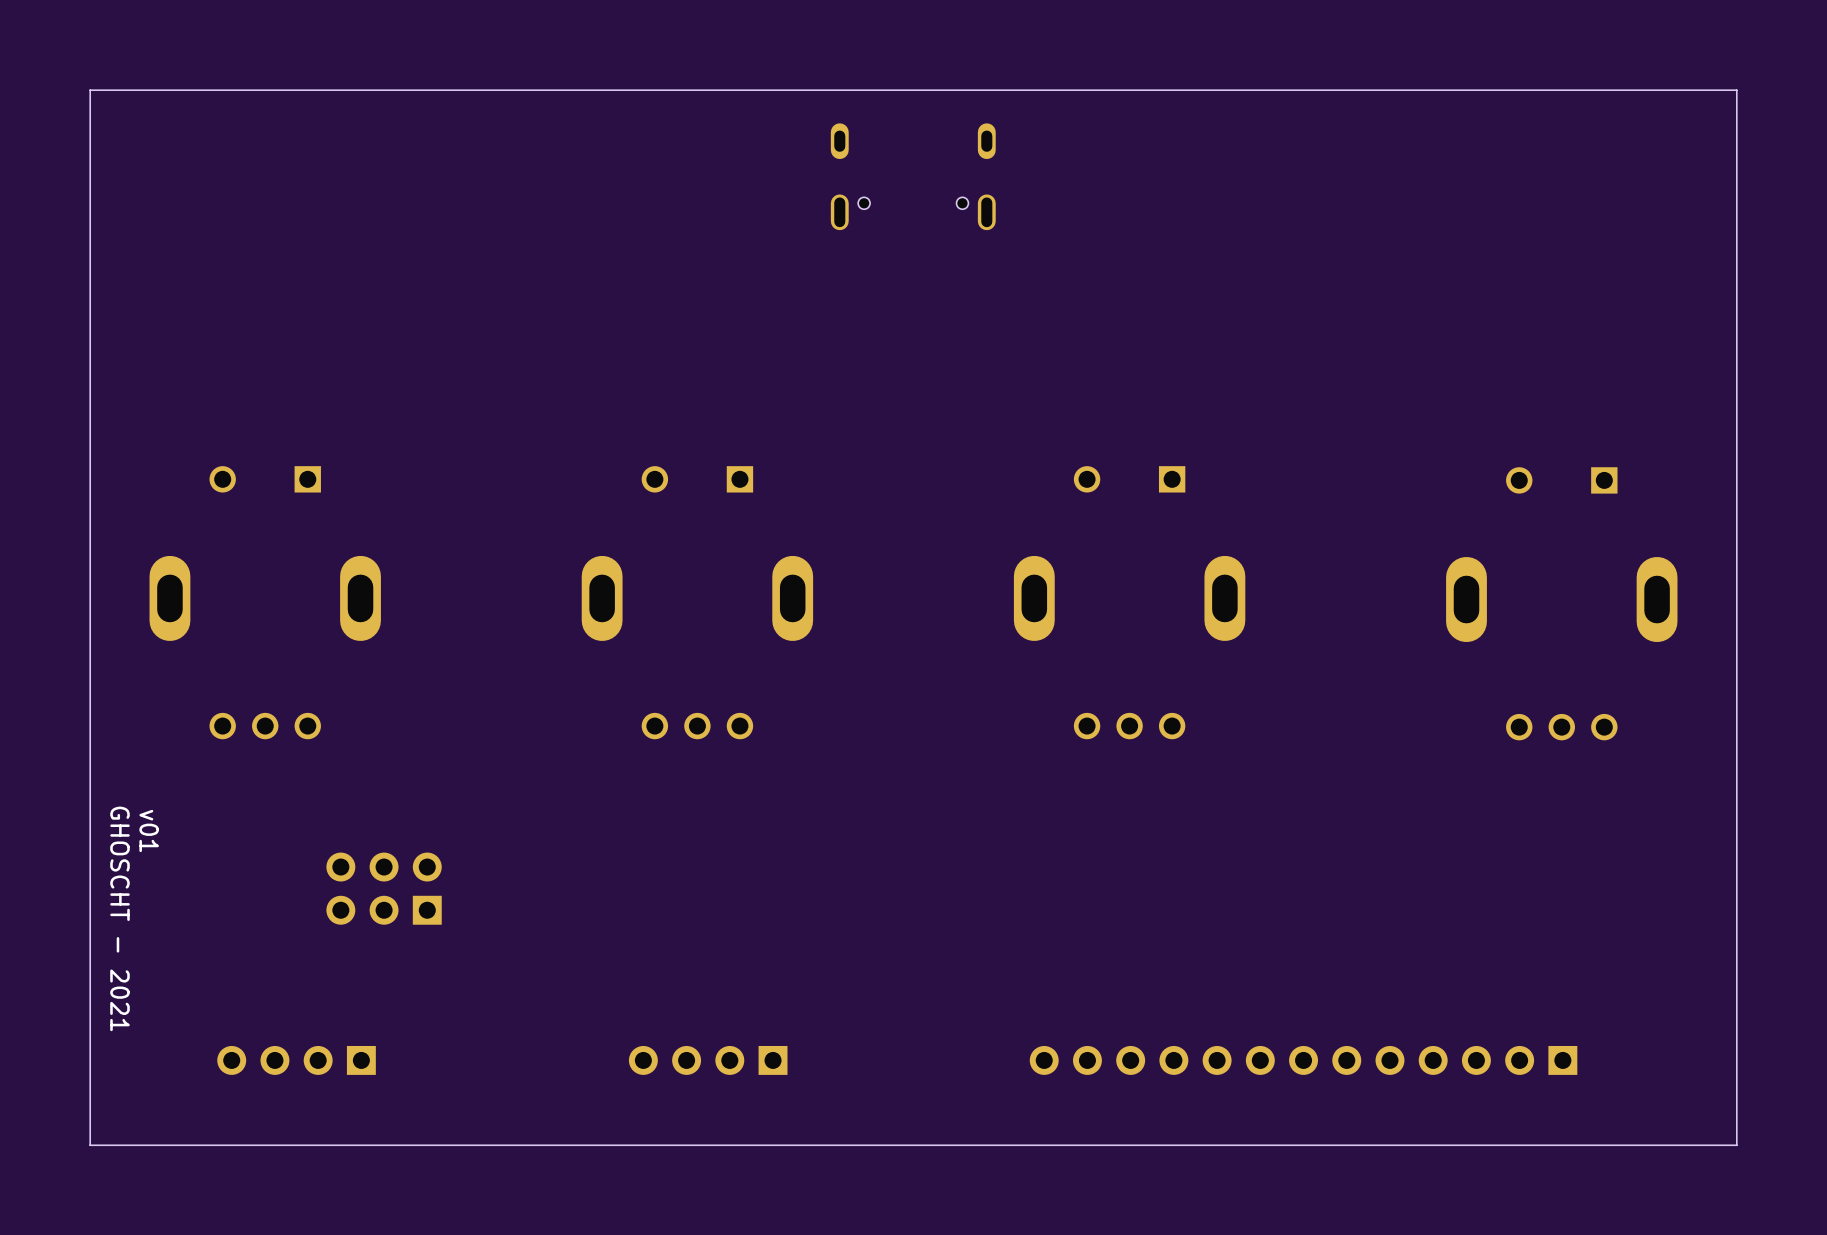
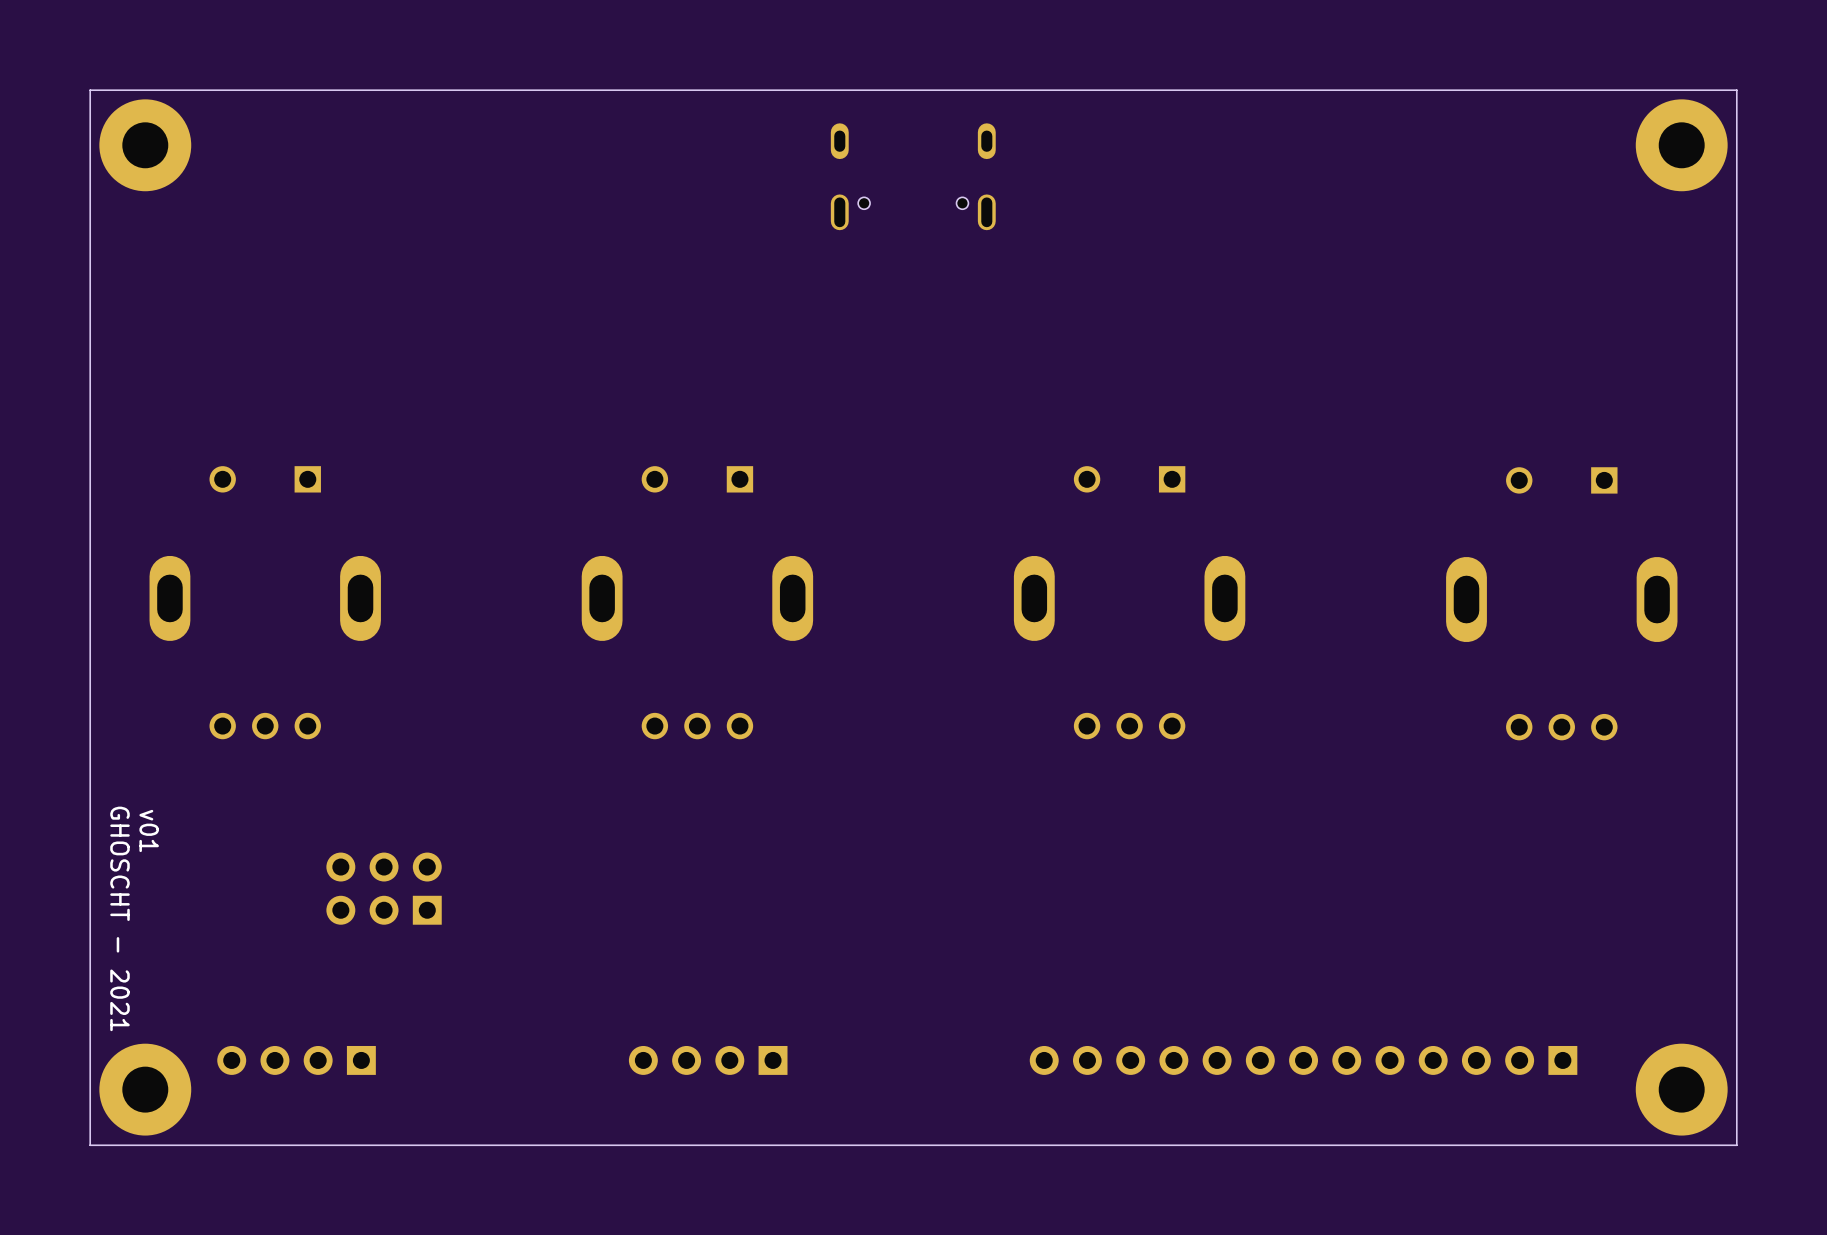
part: none -> (145, 145)
part: none -> (1681, 145)
part: none -> (145, 1089)
part: none -> (1681, 1089)

